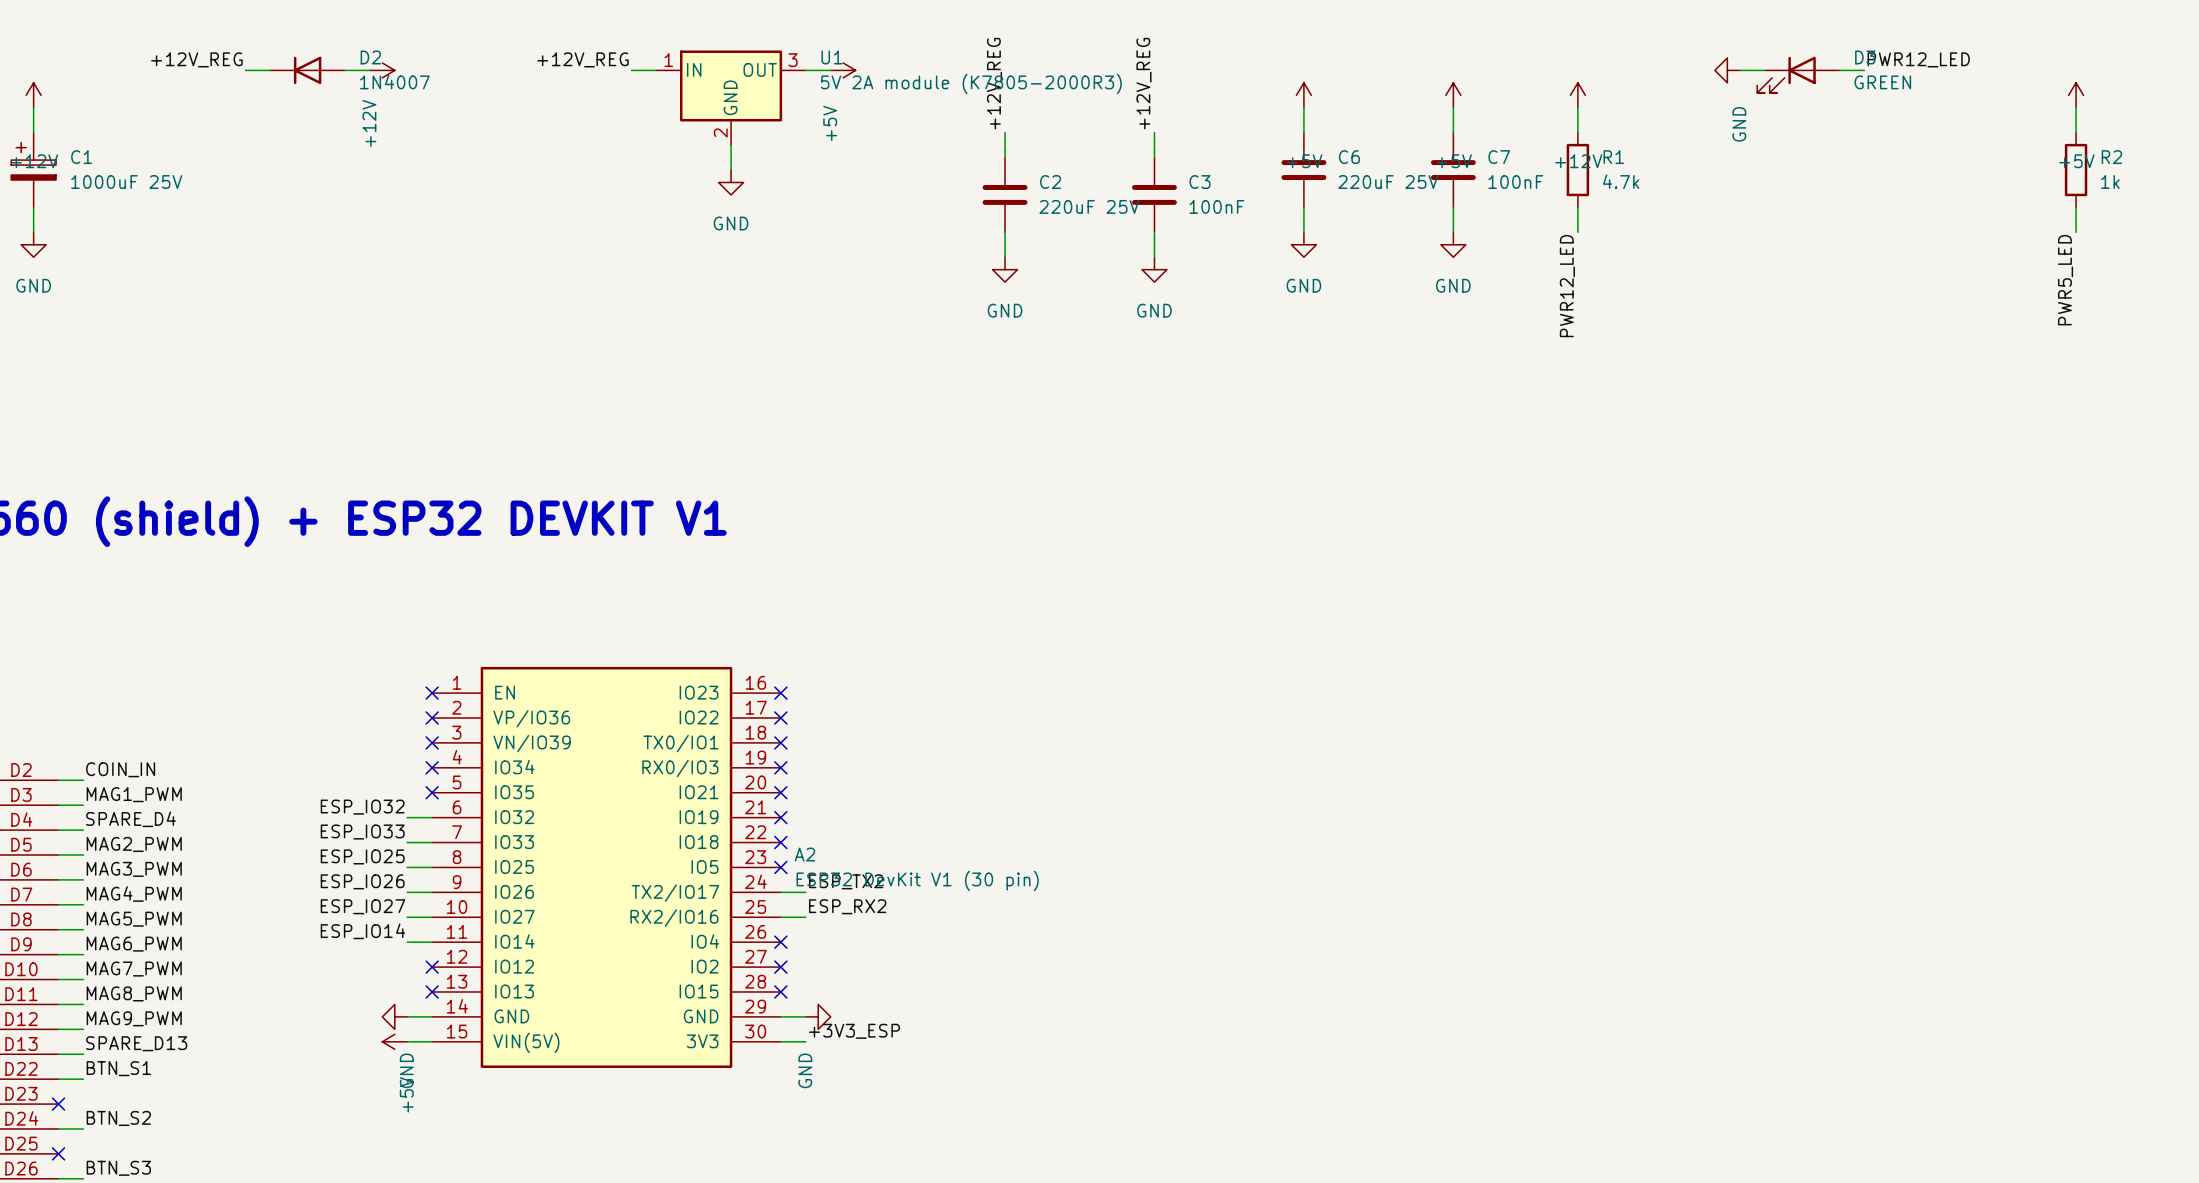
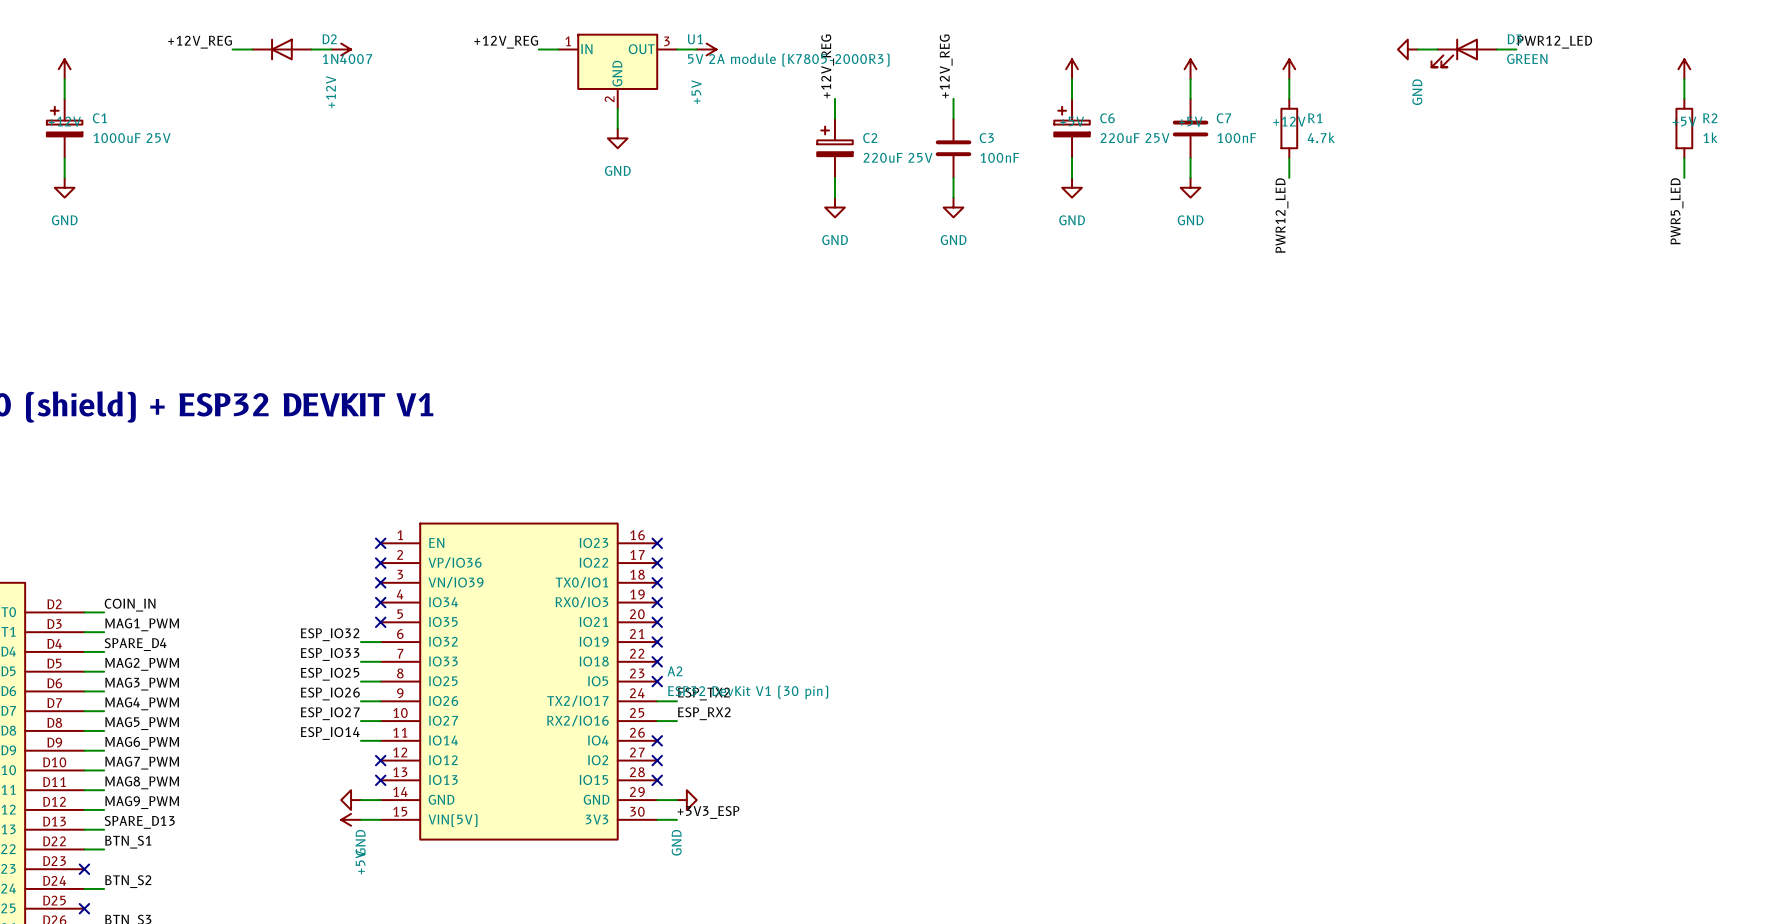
C6 symbol: [1281, 132, 1327, 208] -> [1054, 98, 1090, 159]
C2 symbol: [982, 157, 1028, 233] -> [817, 118, 853, 178]

